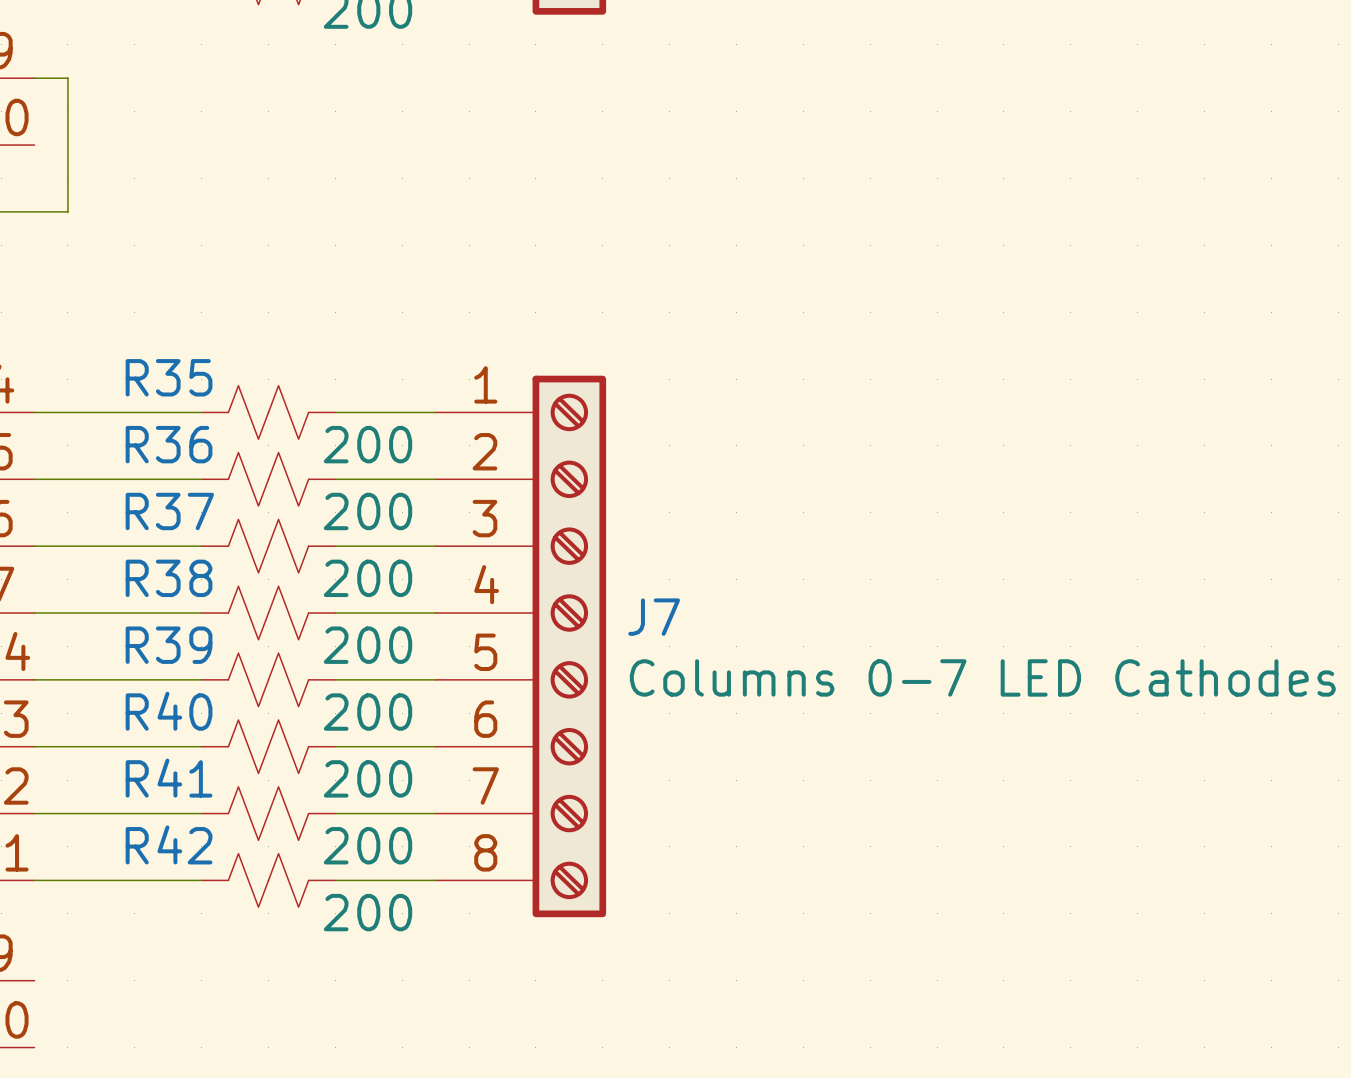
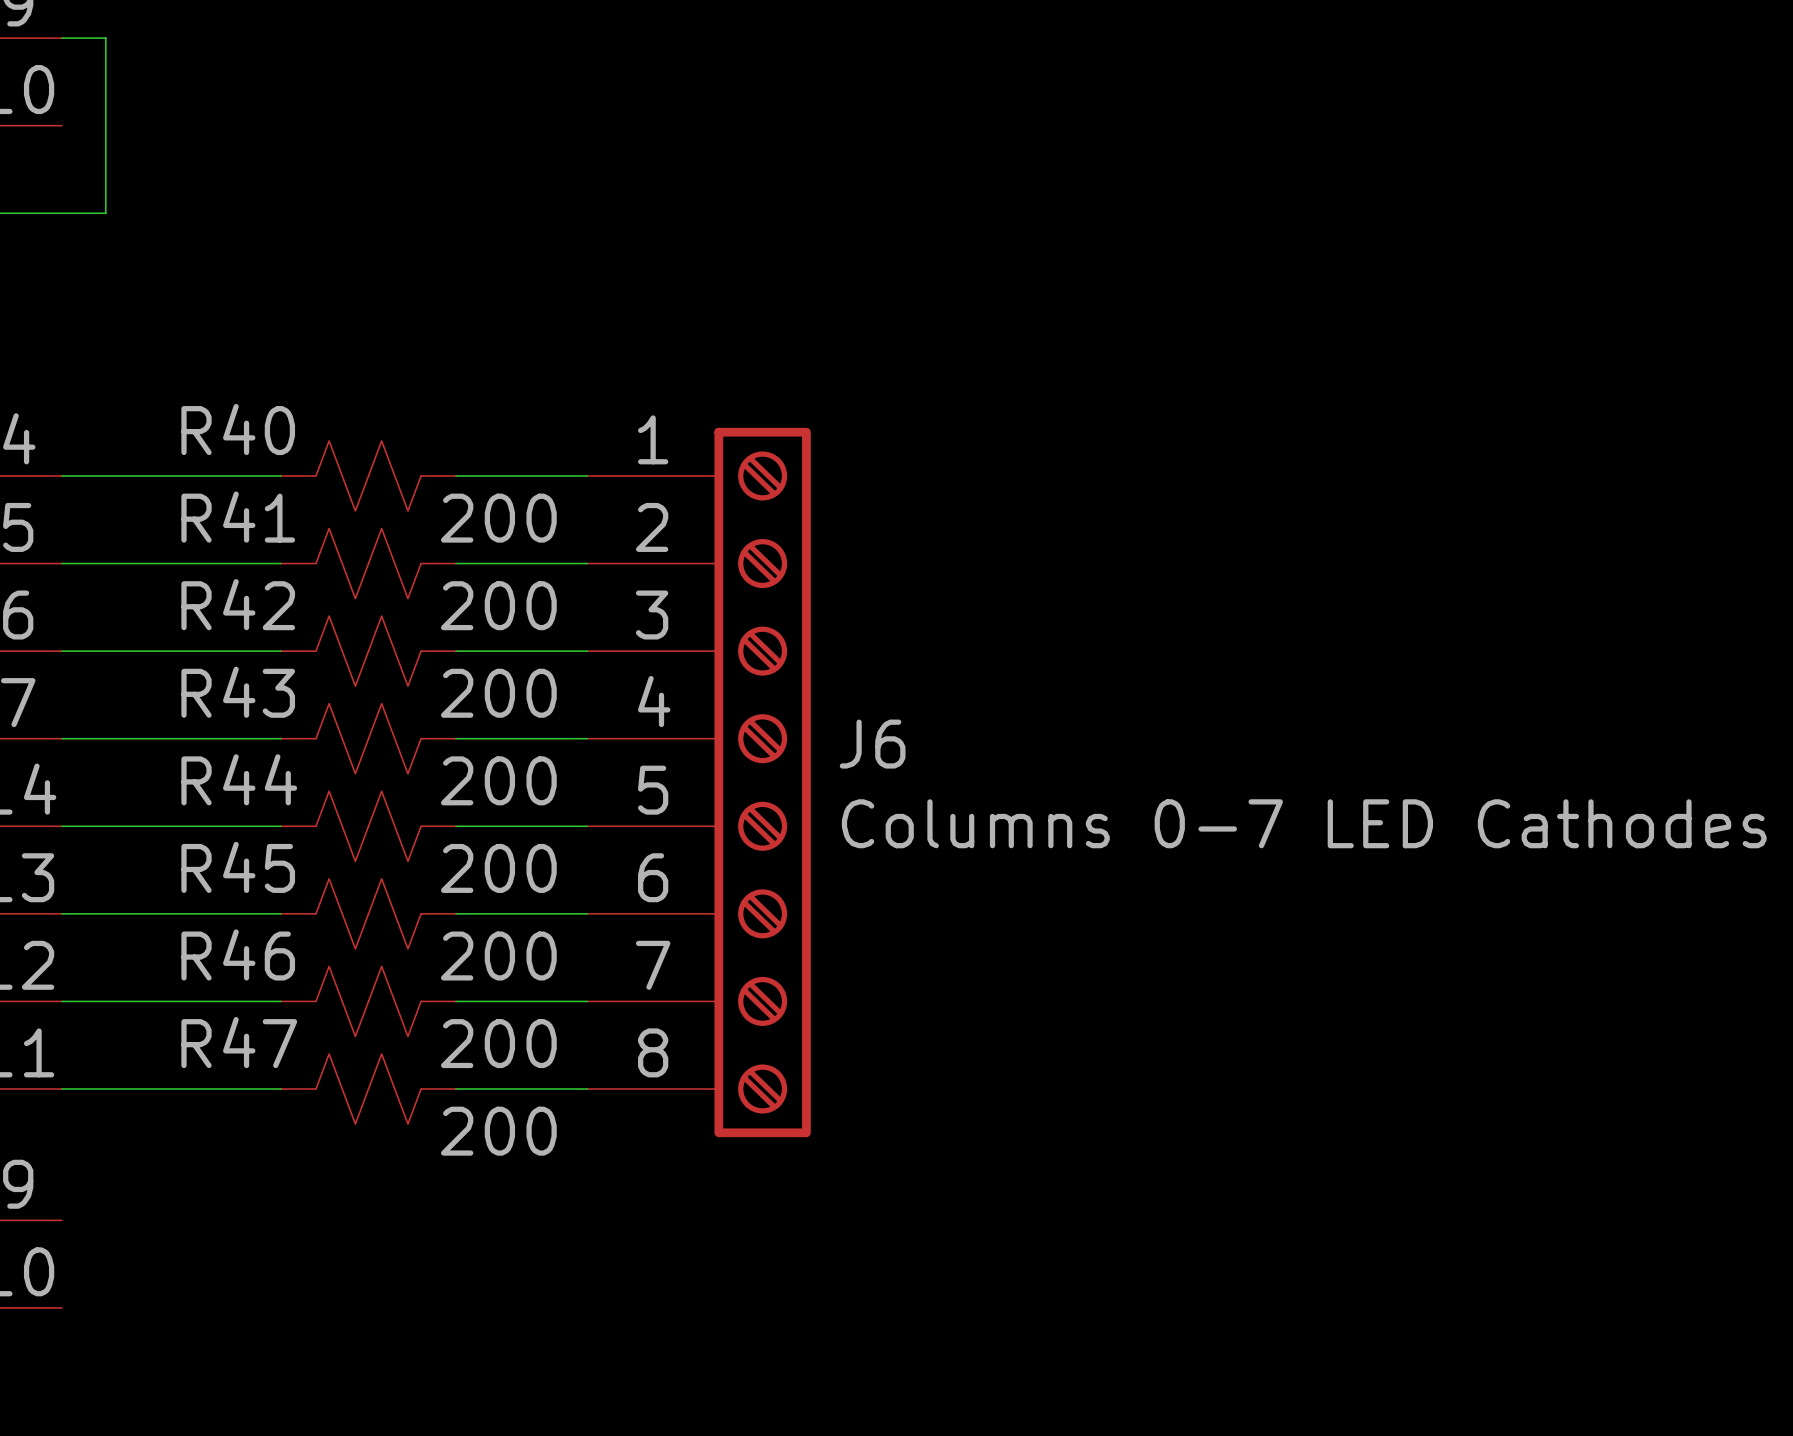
R35 name: R35 (169, 377) -> R40 (238, 429)
R36 name: R36 (169, 444) -> R41 (238, 517)
R37 name: R37 (169, 511) -> R42 (238, 604)
R38 name: R38 (169, 578) -> R43 (238, 692)
J7 name: J7 (654, 617) -> J6 (872, 744)
R39 name: R39 (169, 645) -> R44 (239, 779)
R40 name: R40 (169, 711) -> R45 (238, 867)
R41 name: R41 (169, 778) -> R46 (238, 954)
R42 name: R42 (169, 844) -> R47 (239, 1042)

